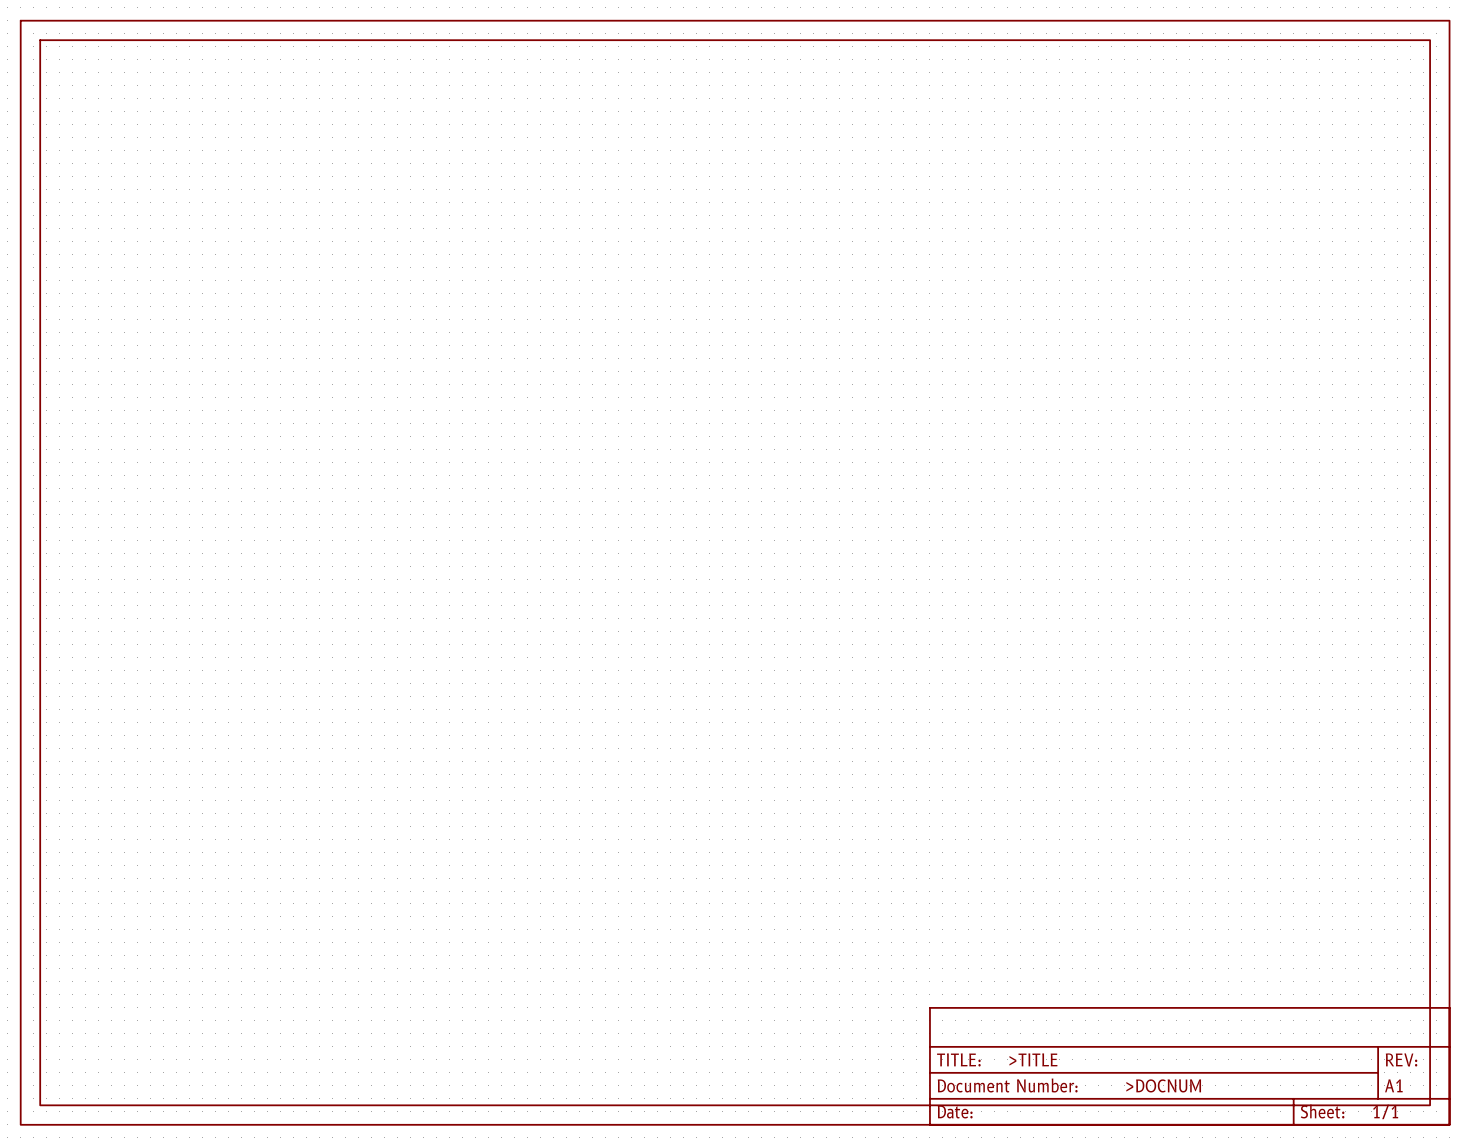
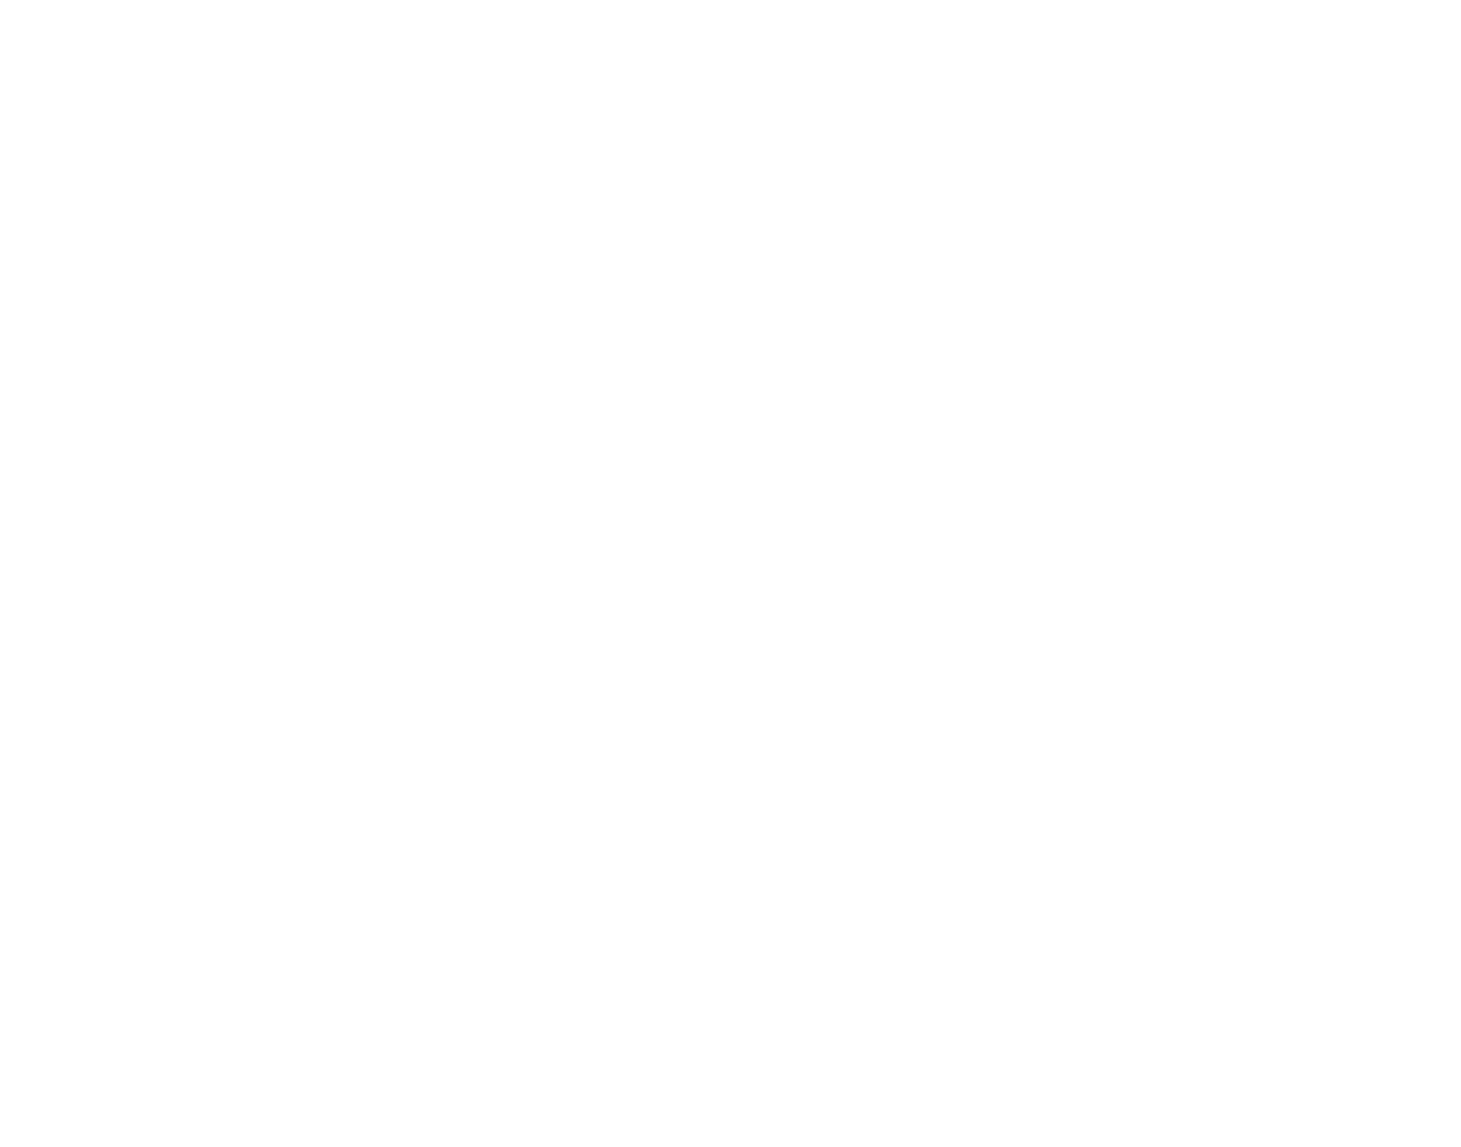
part: (735, 572) -> none
part: (1189, 1066) -> none

